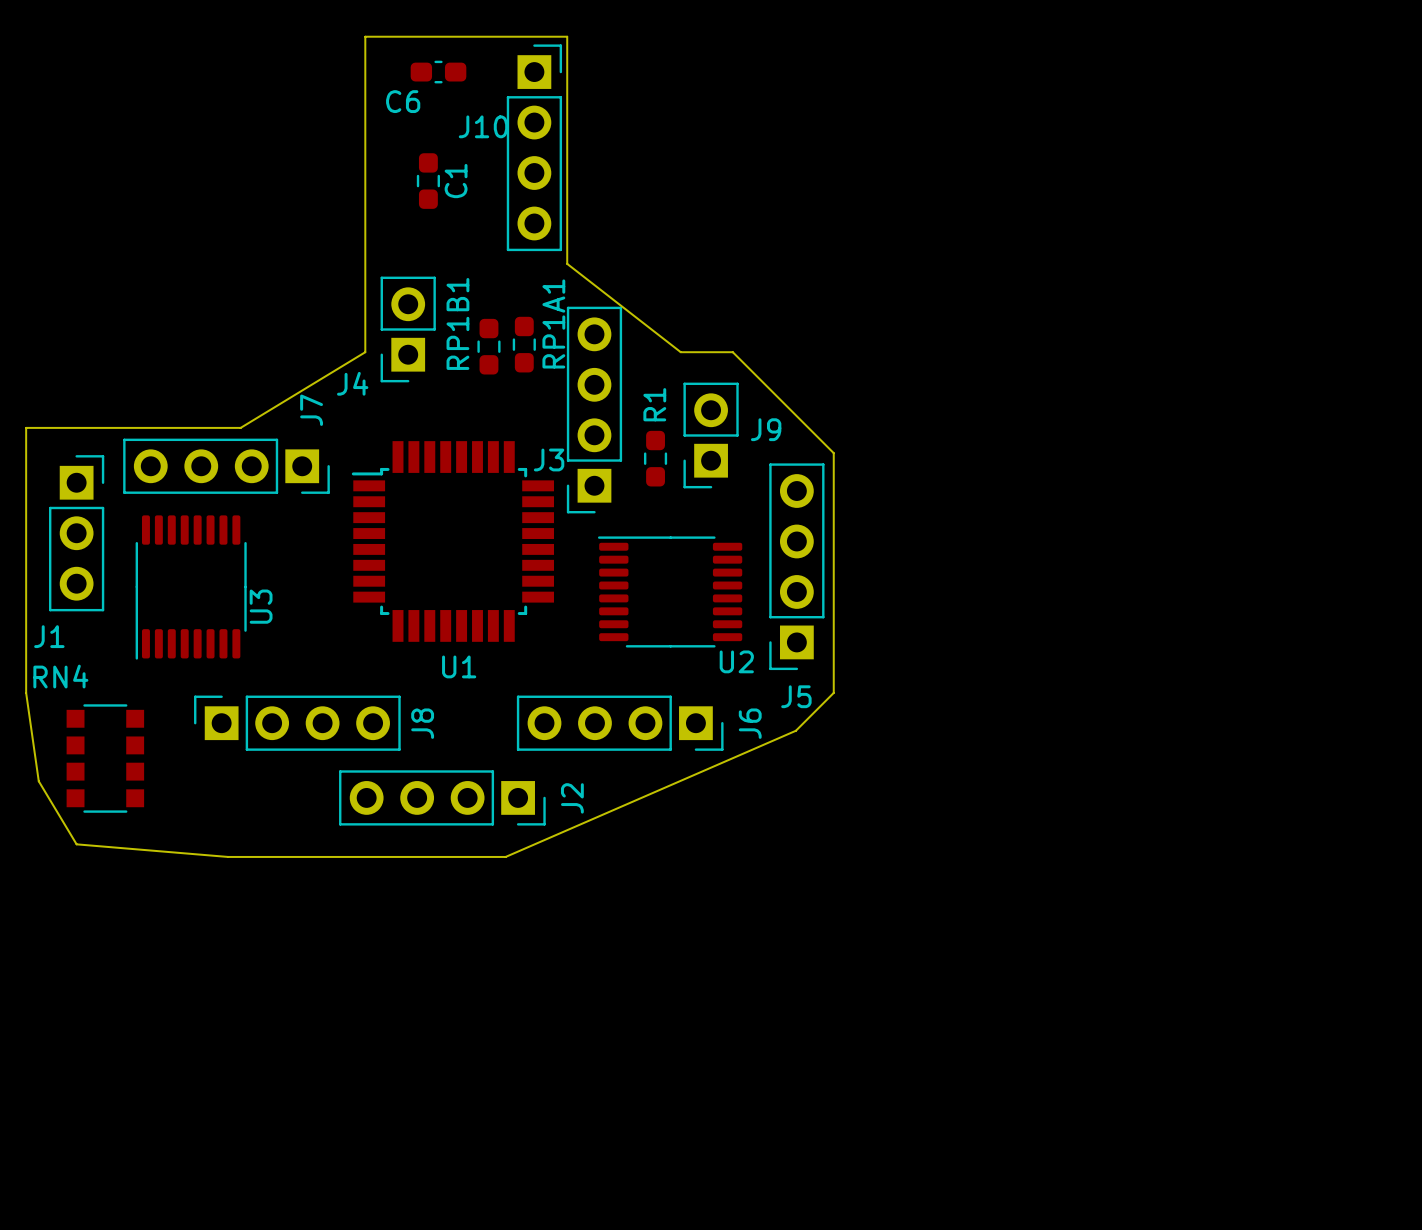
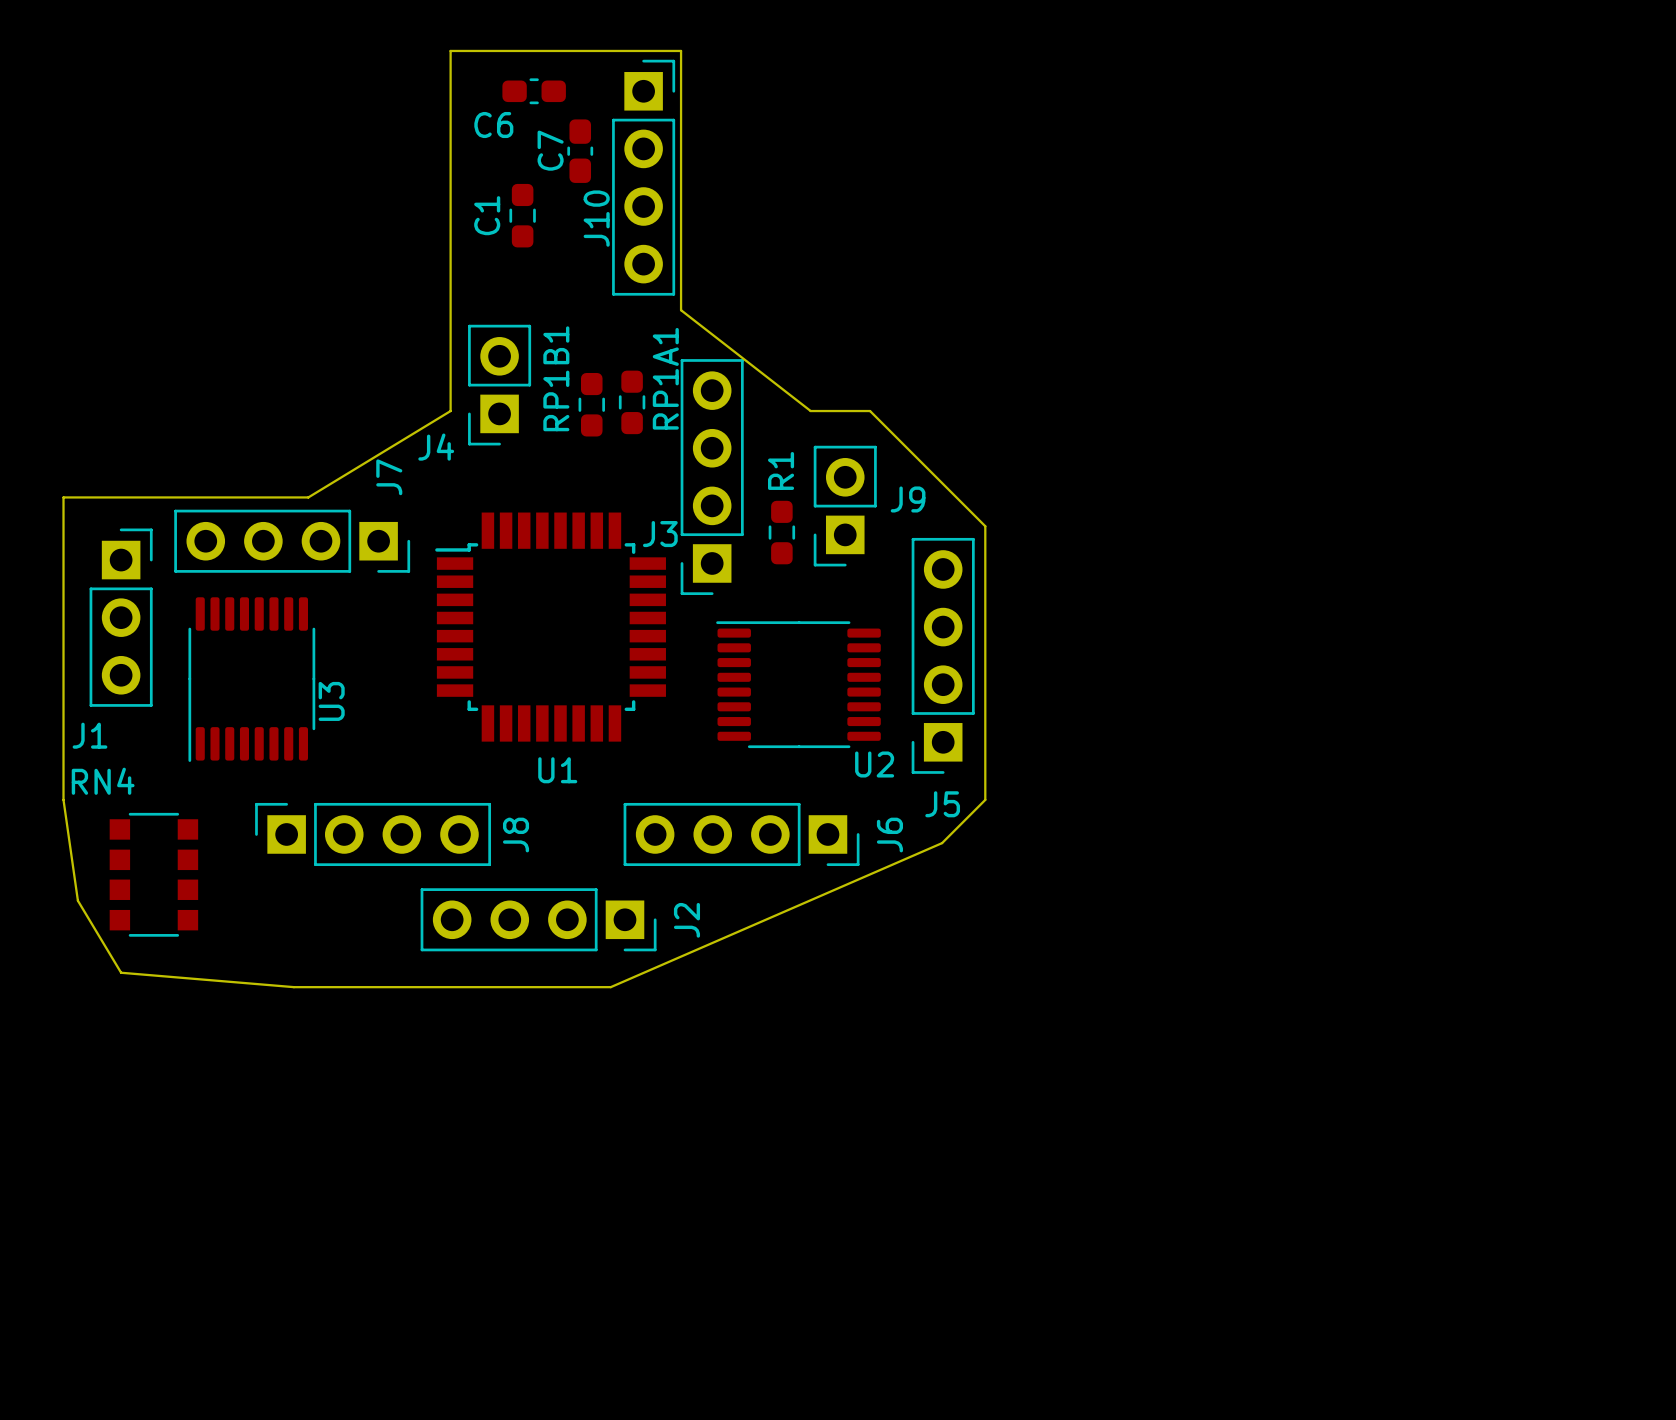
C7: none -> (580, 151)
J10 name rotation: 0° (483, 126) -> 90° counterclockwise (596, 218)
C1 name position: C1 (456, 181) -> C1 (487, 215)

